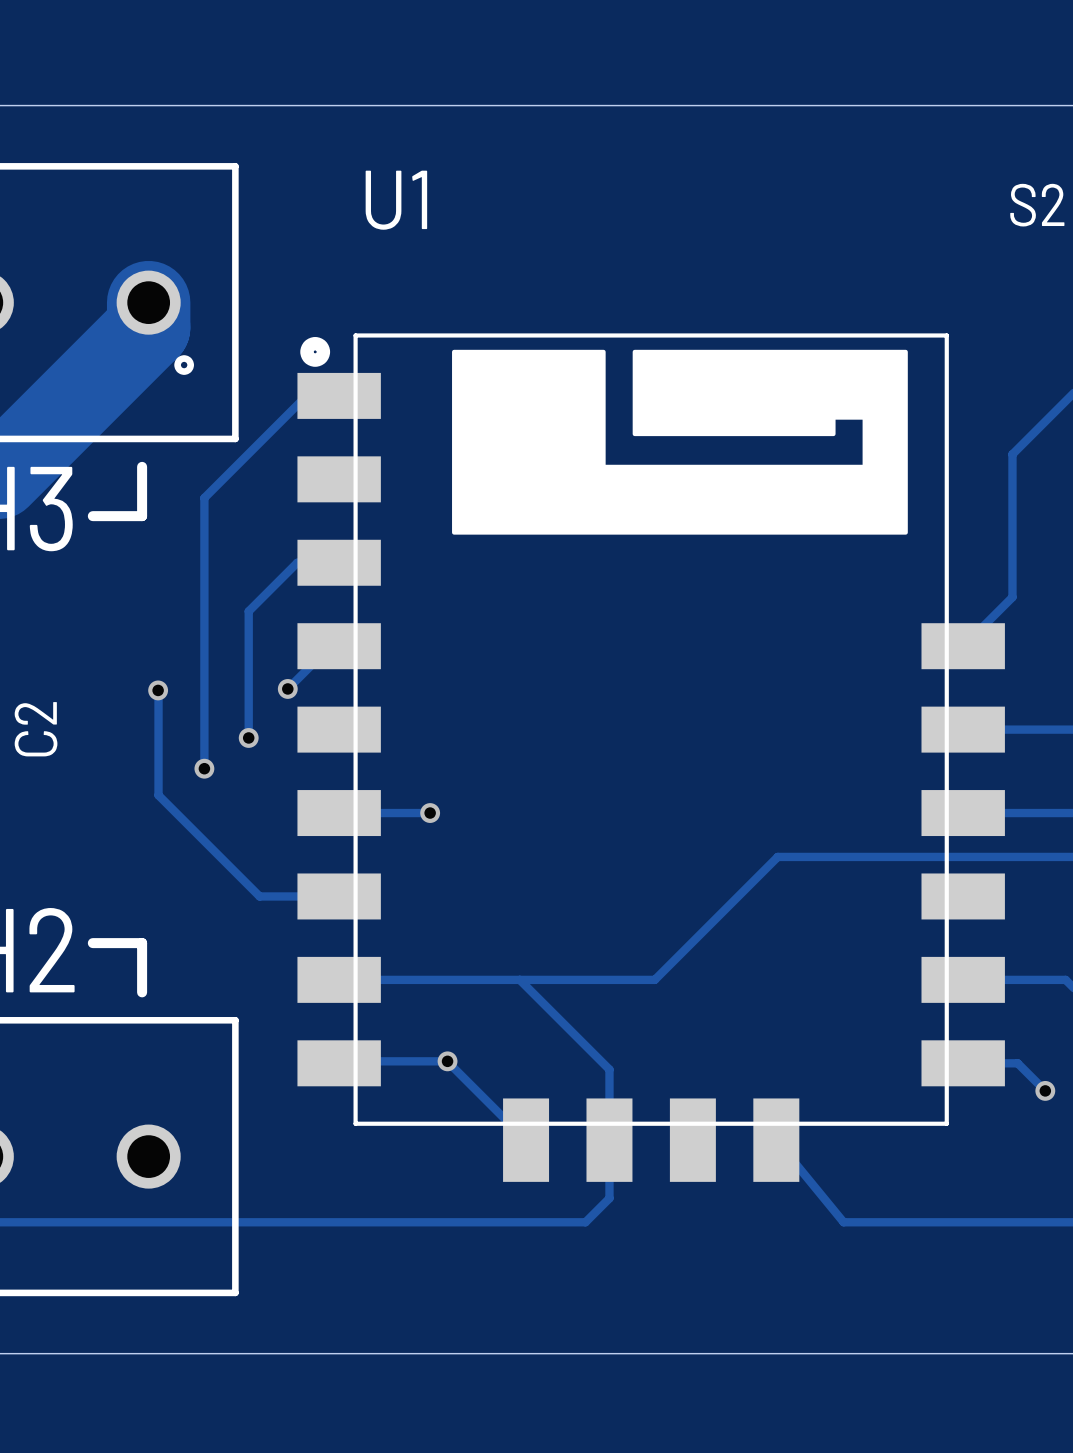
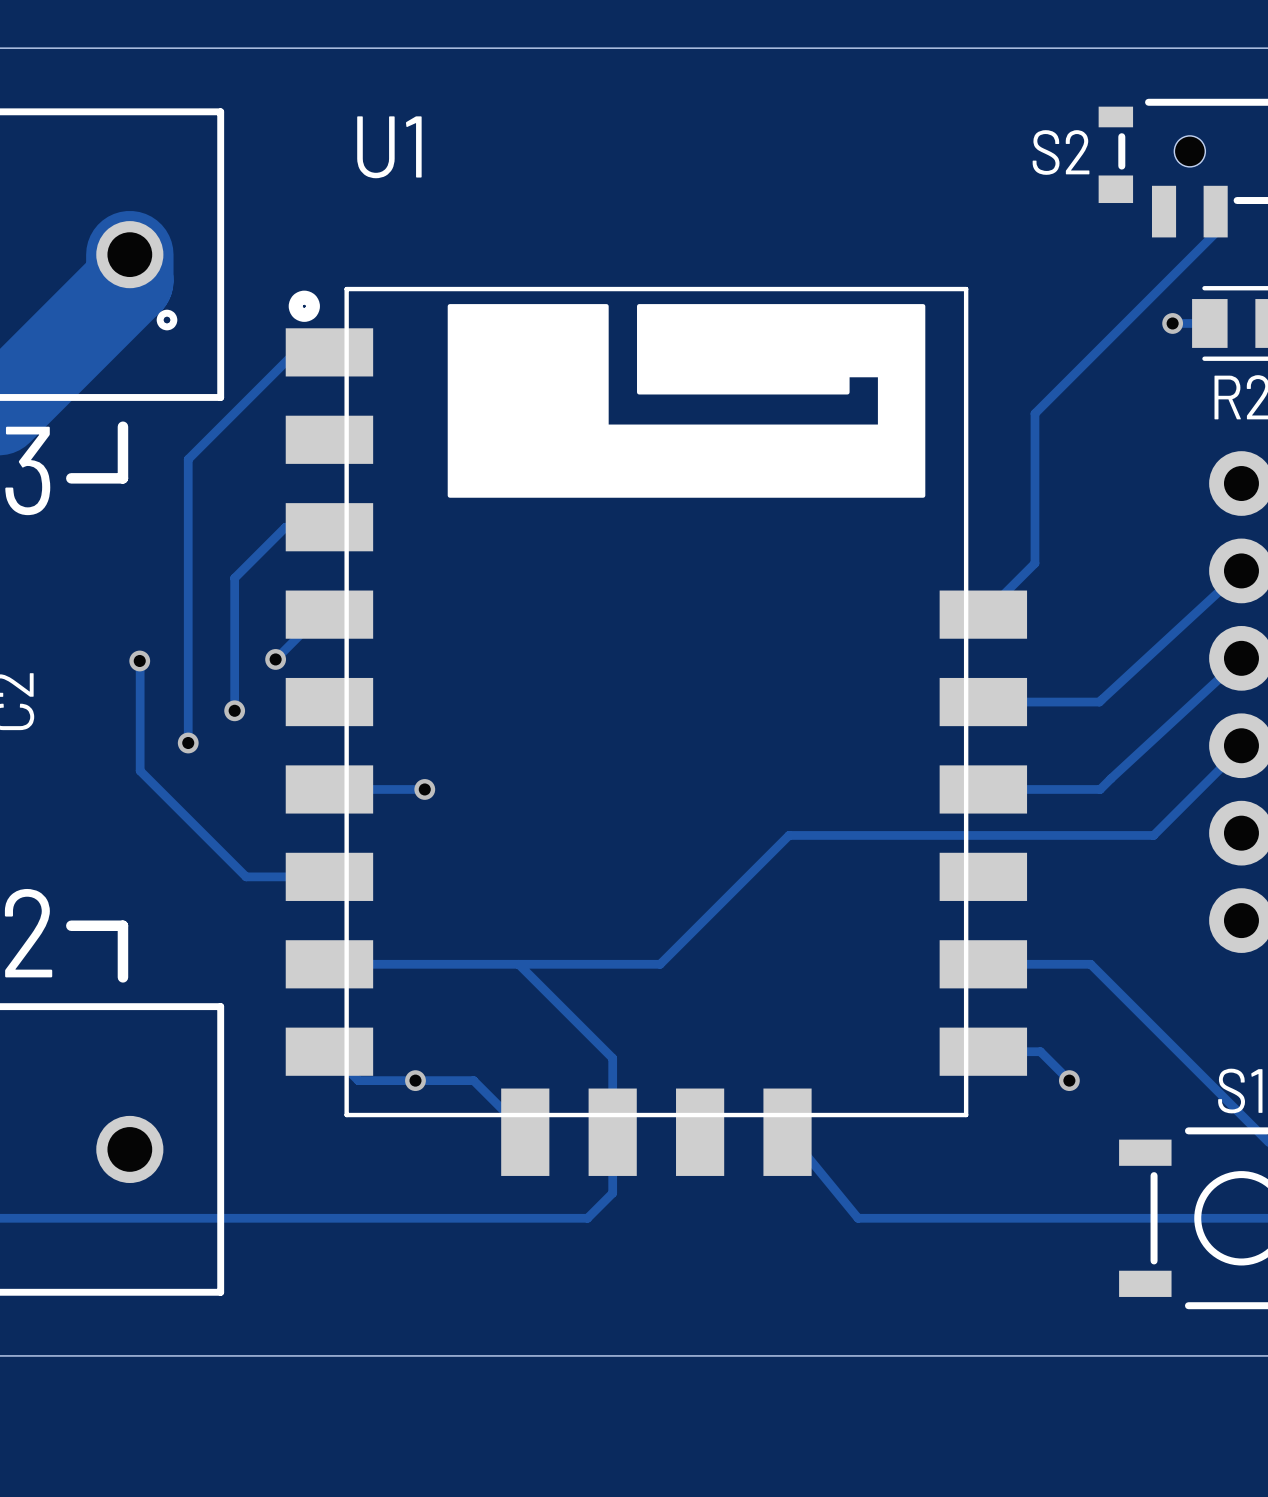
track: (447, 1061) (341, 1061) (339, 1063) -> (473, 1080) (358, 1080) (329, 1051)
track: (447, 1061) (476, 1090) -> none
via position: (447, 1061) -> (415, 1080)

